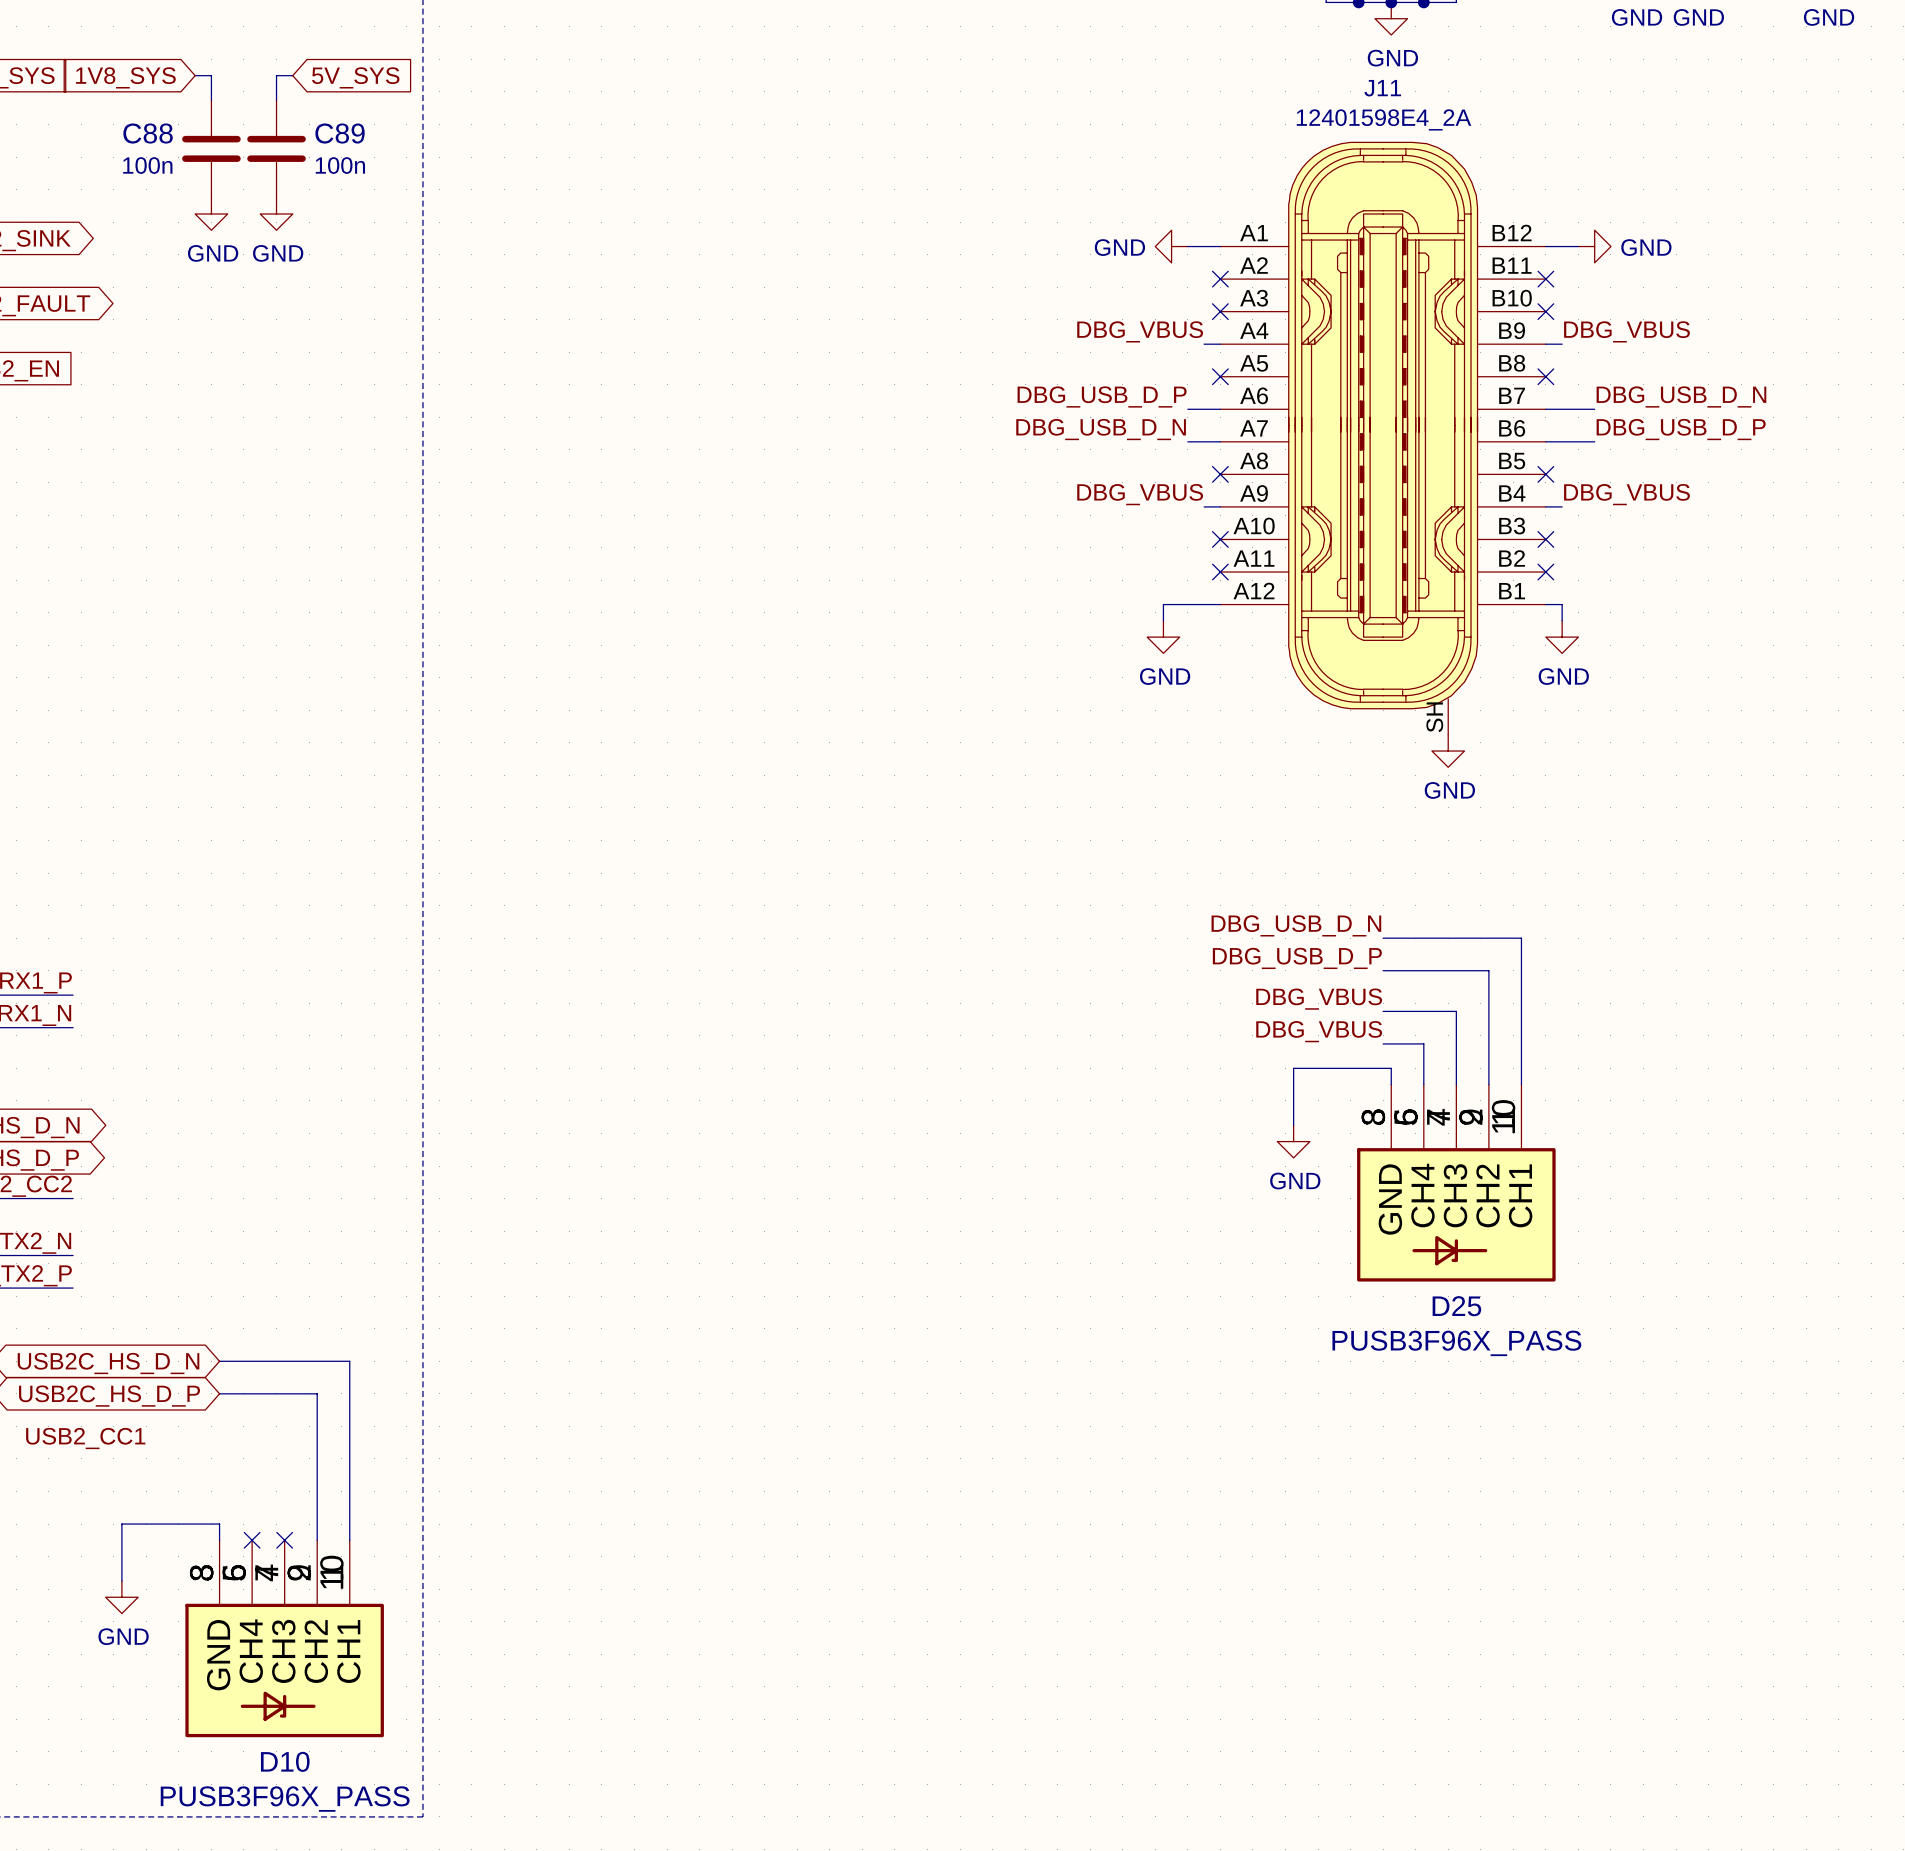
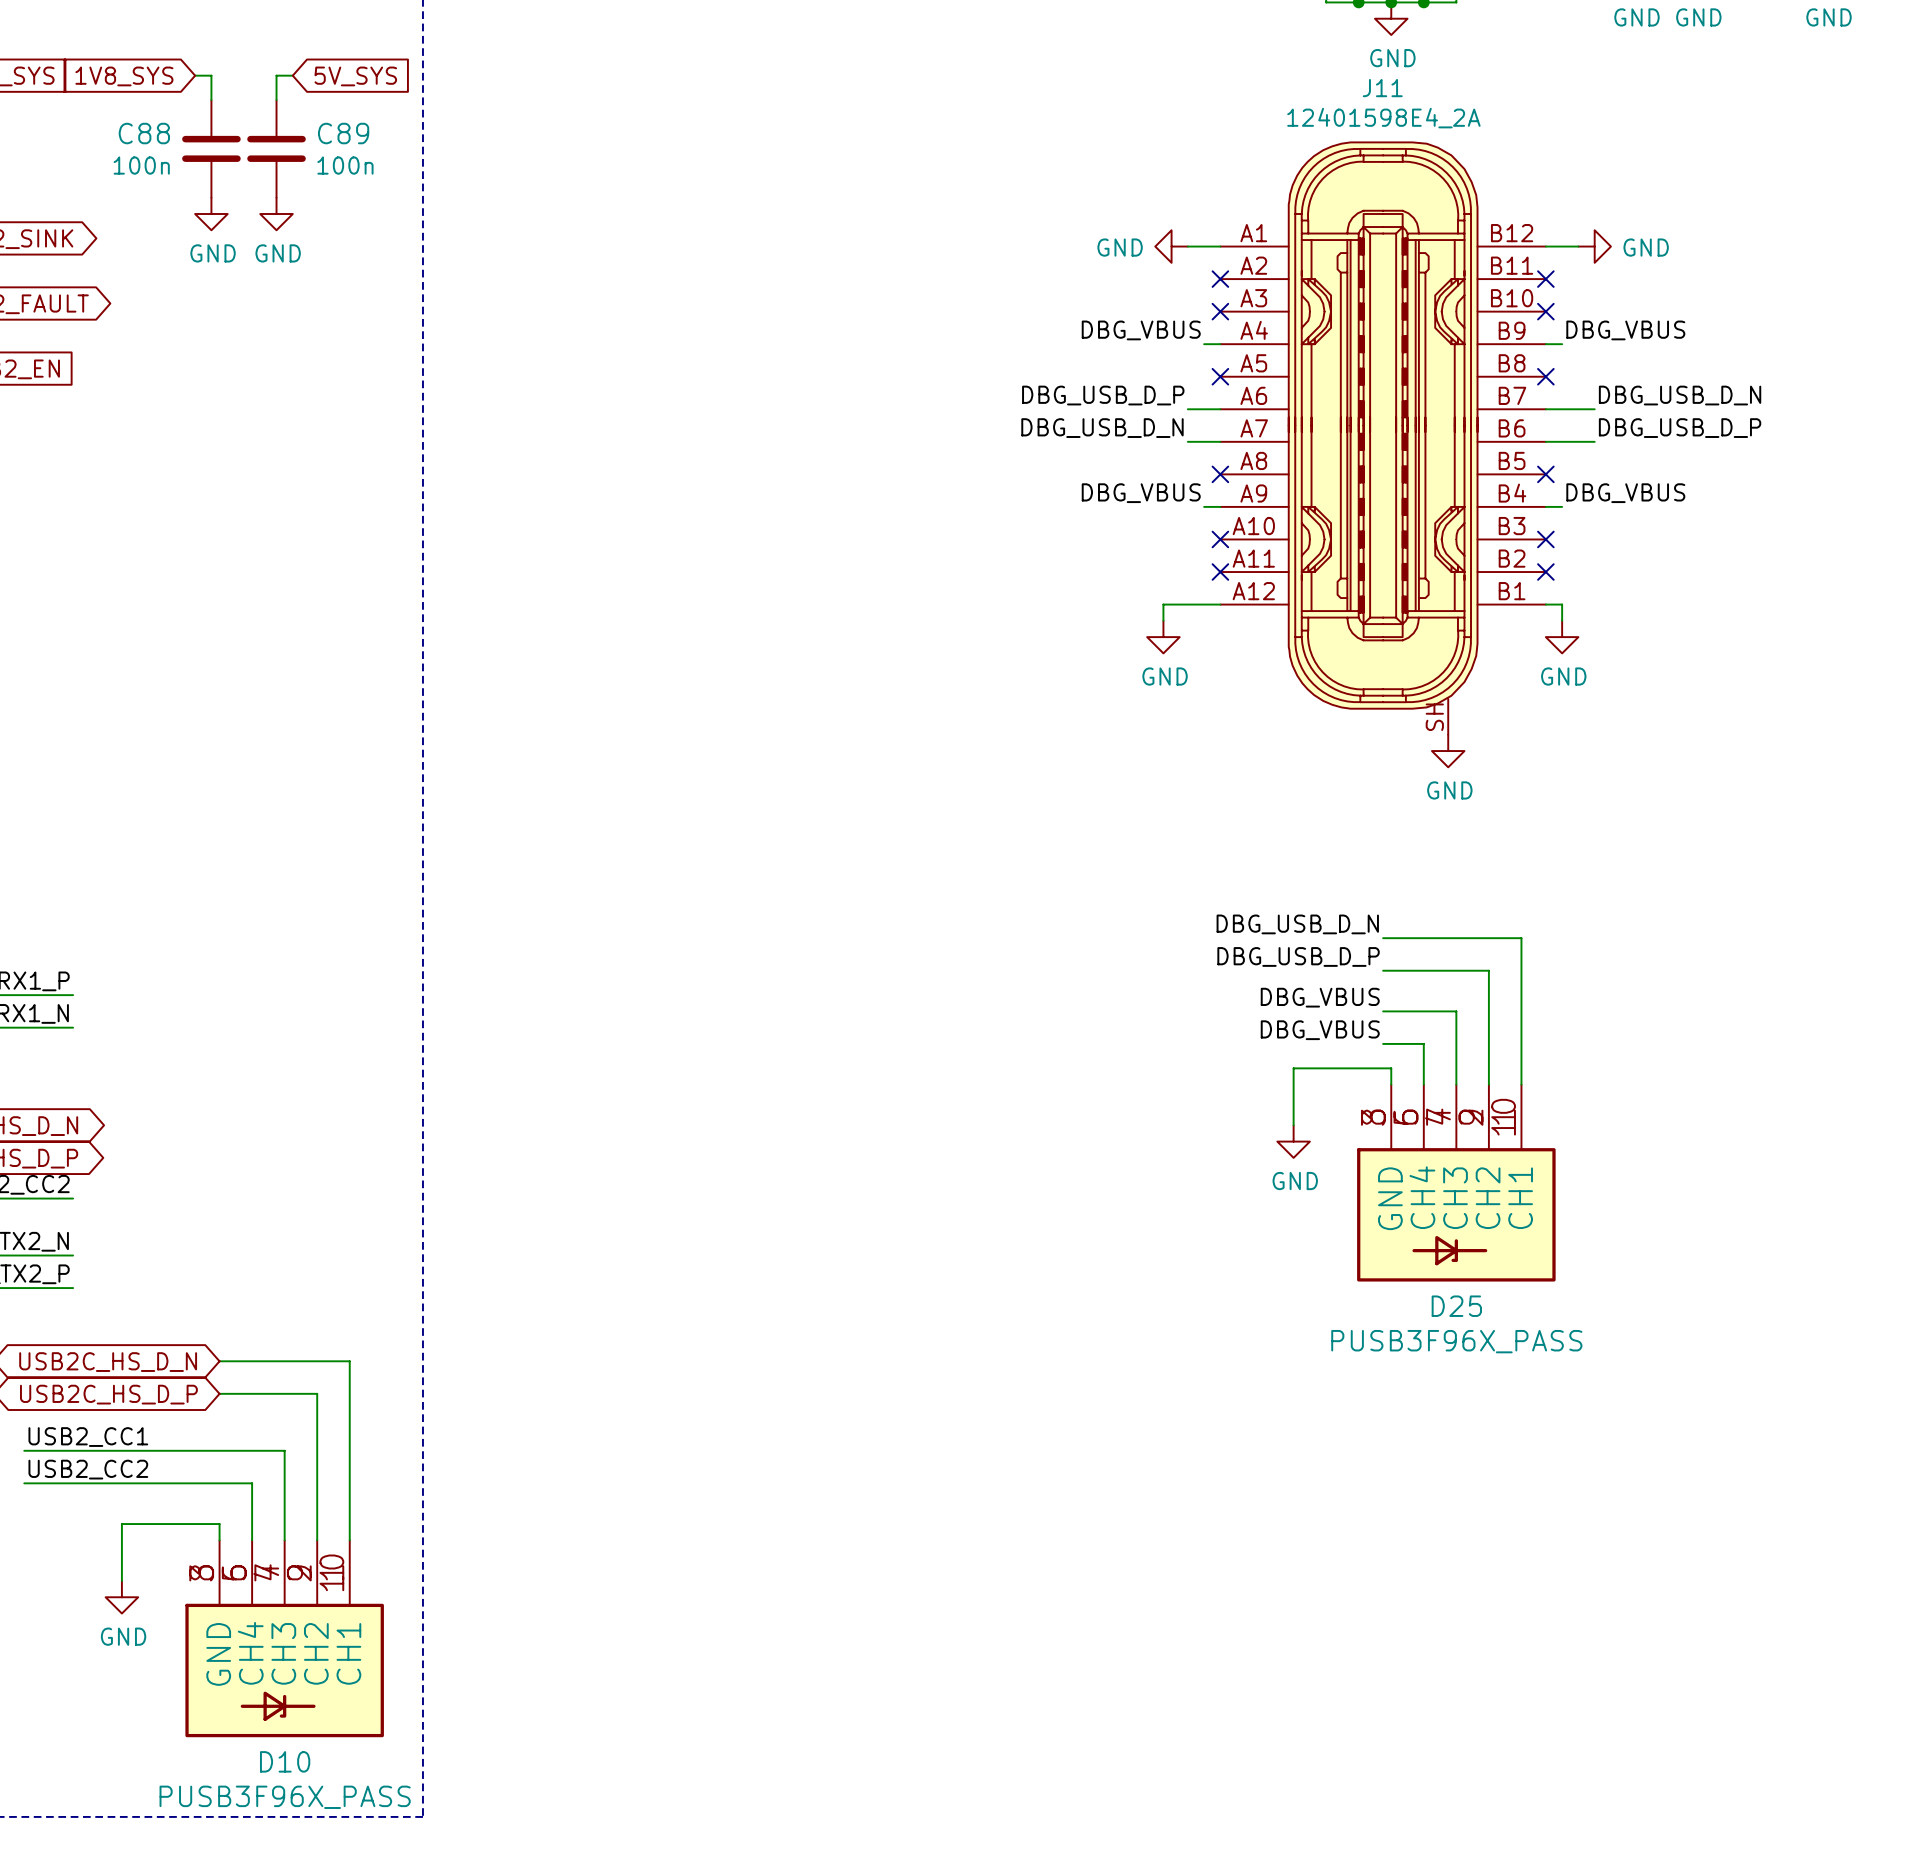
wire: none -> (24, 1450) (284, 1450) (284, 1540)
label: none -> USB2_CC2 (88, 1469)
wire: none -> (24, 1483) (252, 1483) (252, 1540)
no-connect mark: (252, 1540) -> none
no-connect mark: (284, 1540) -> none

